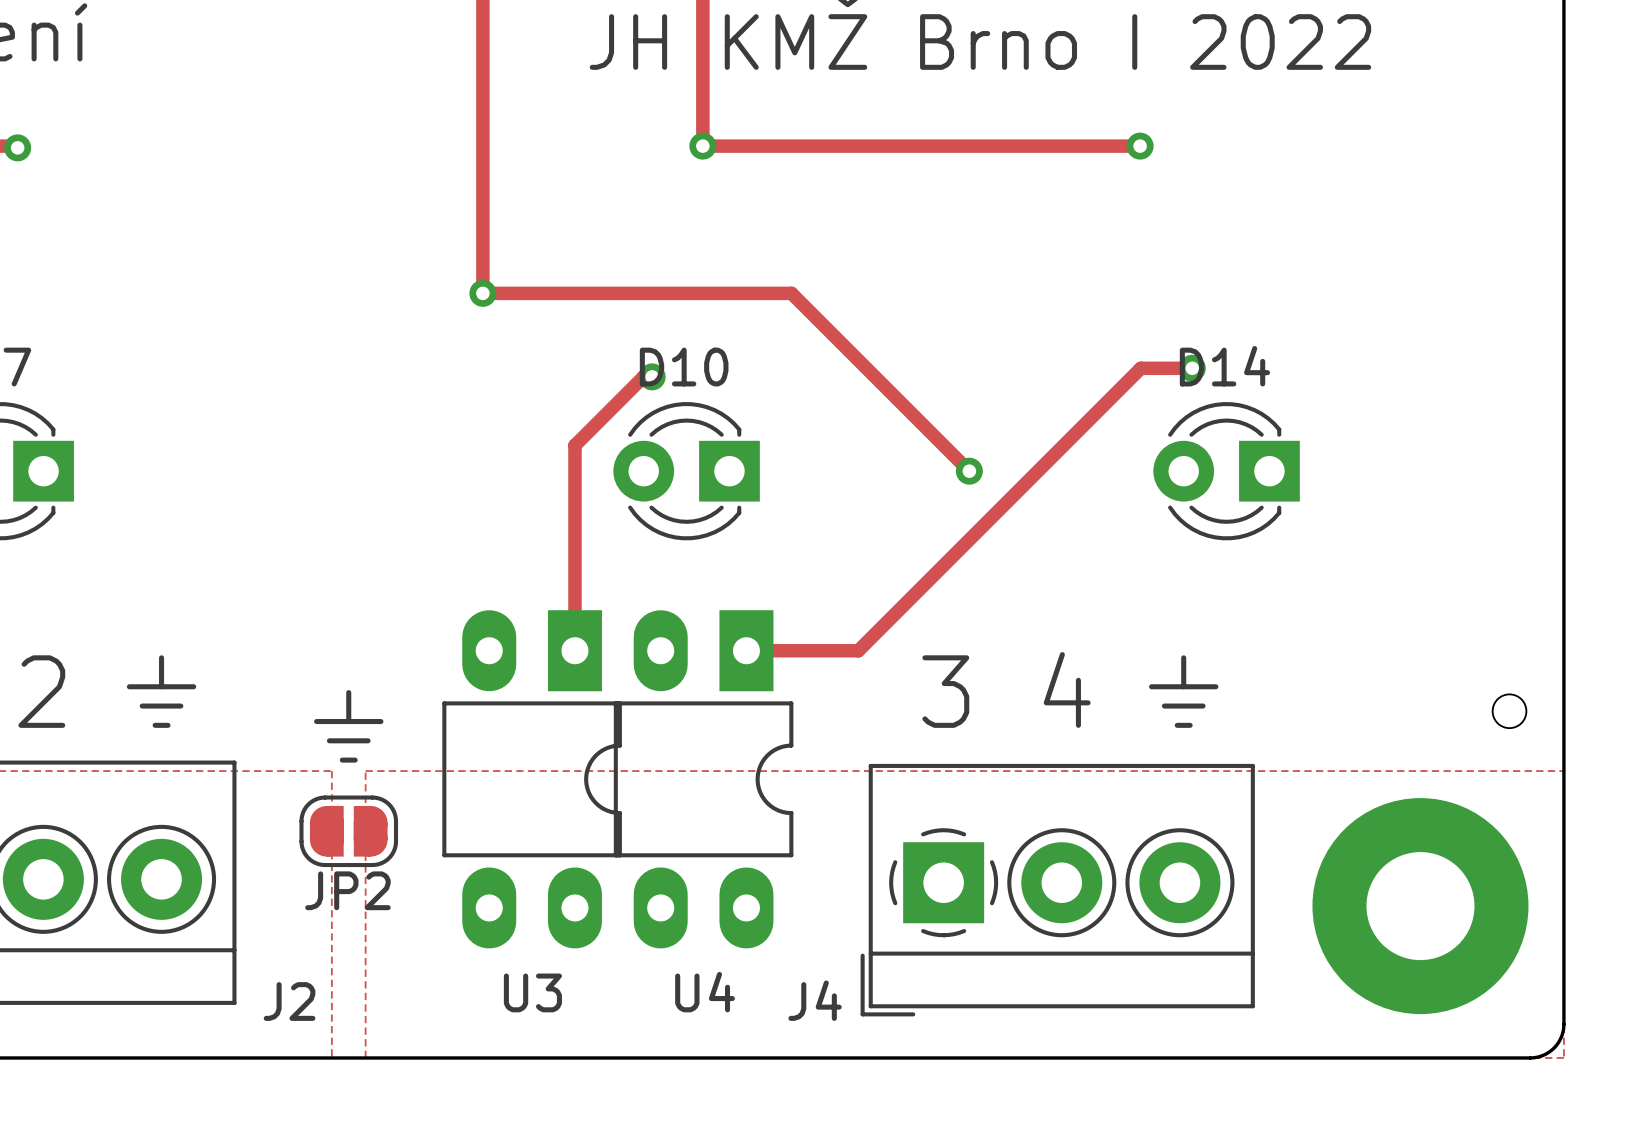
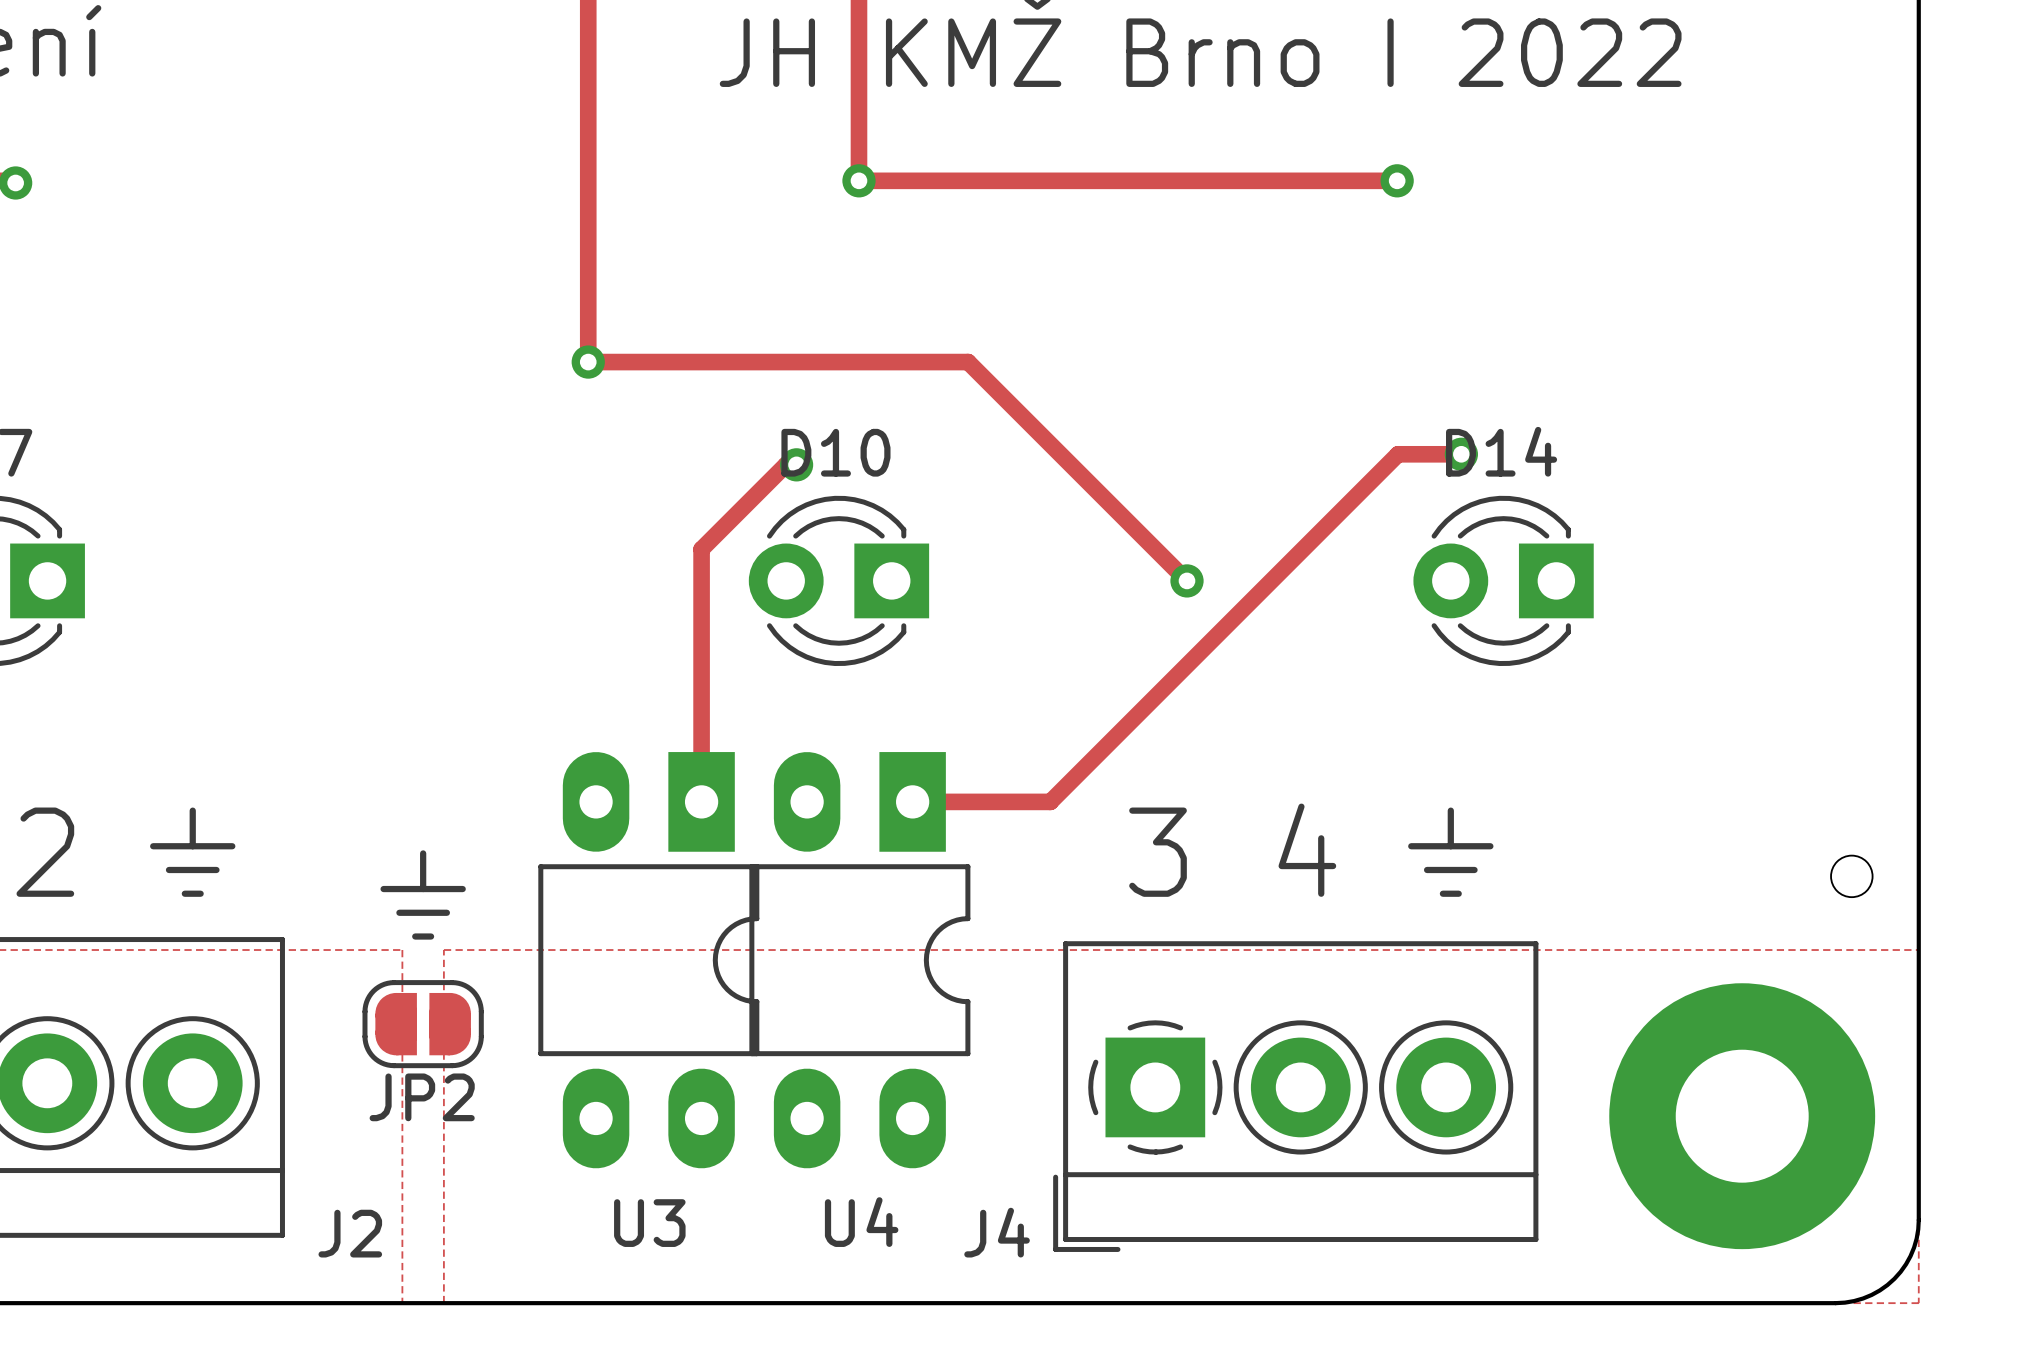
board edge: (1563, 990) (1563, 1031) (1554, 1048) (1537, 1057) (1496, 1057) -> (1918, 1220) (1914, 1247) (1906, 1264) (1894, 1278) (1879, 1290) (1863, 1298) (1835, 1303)

